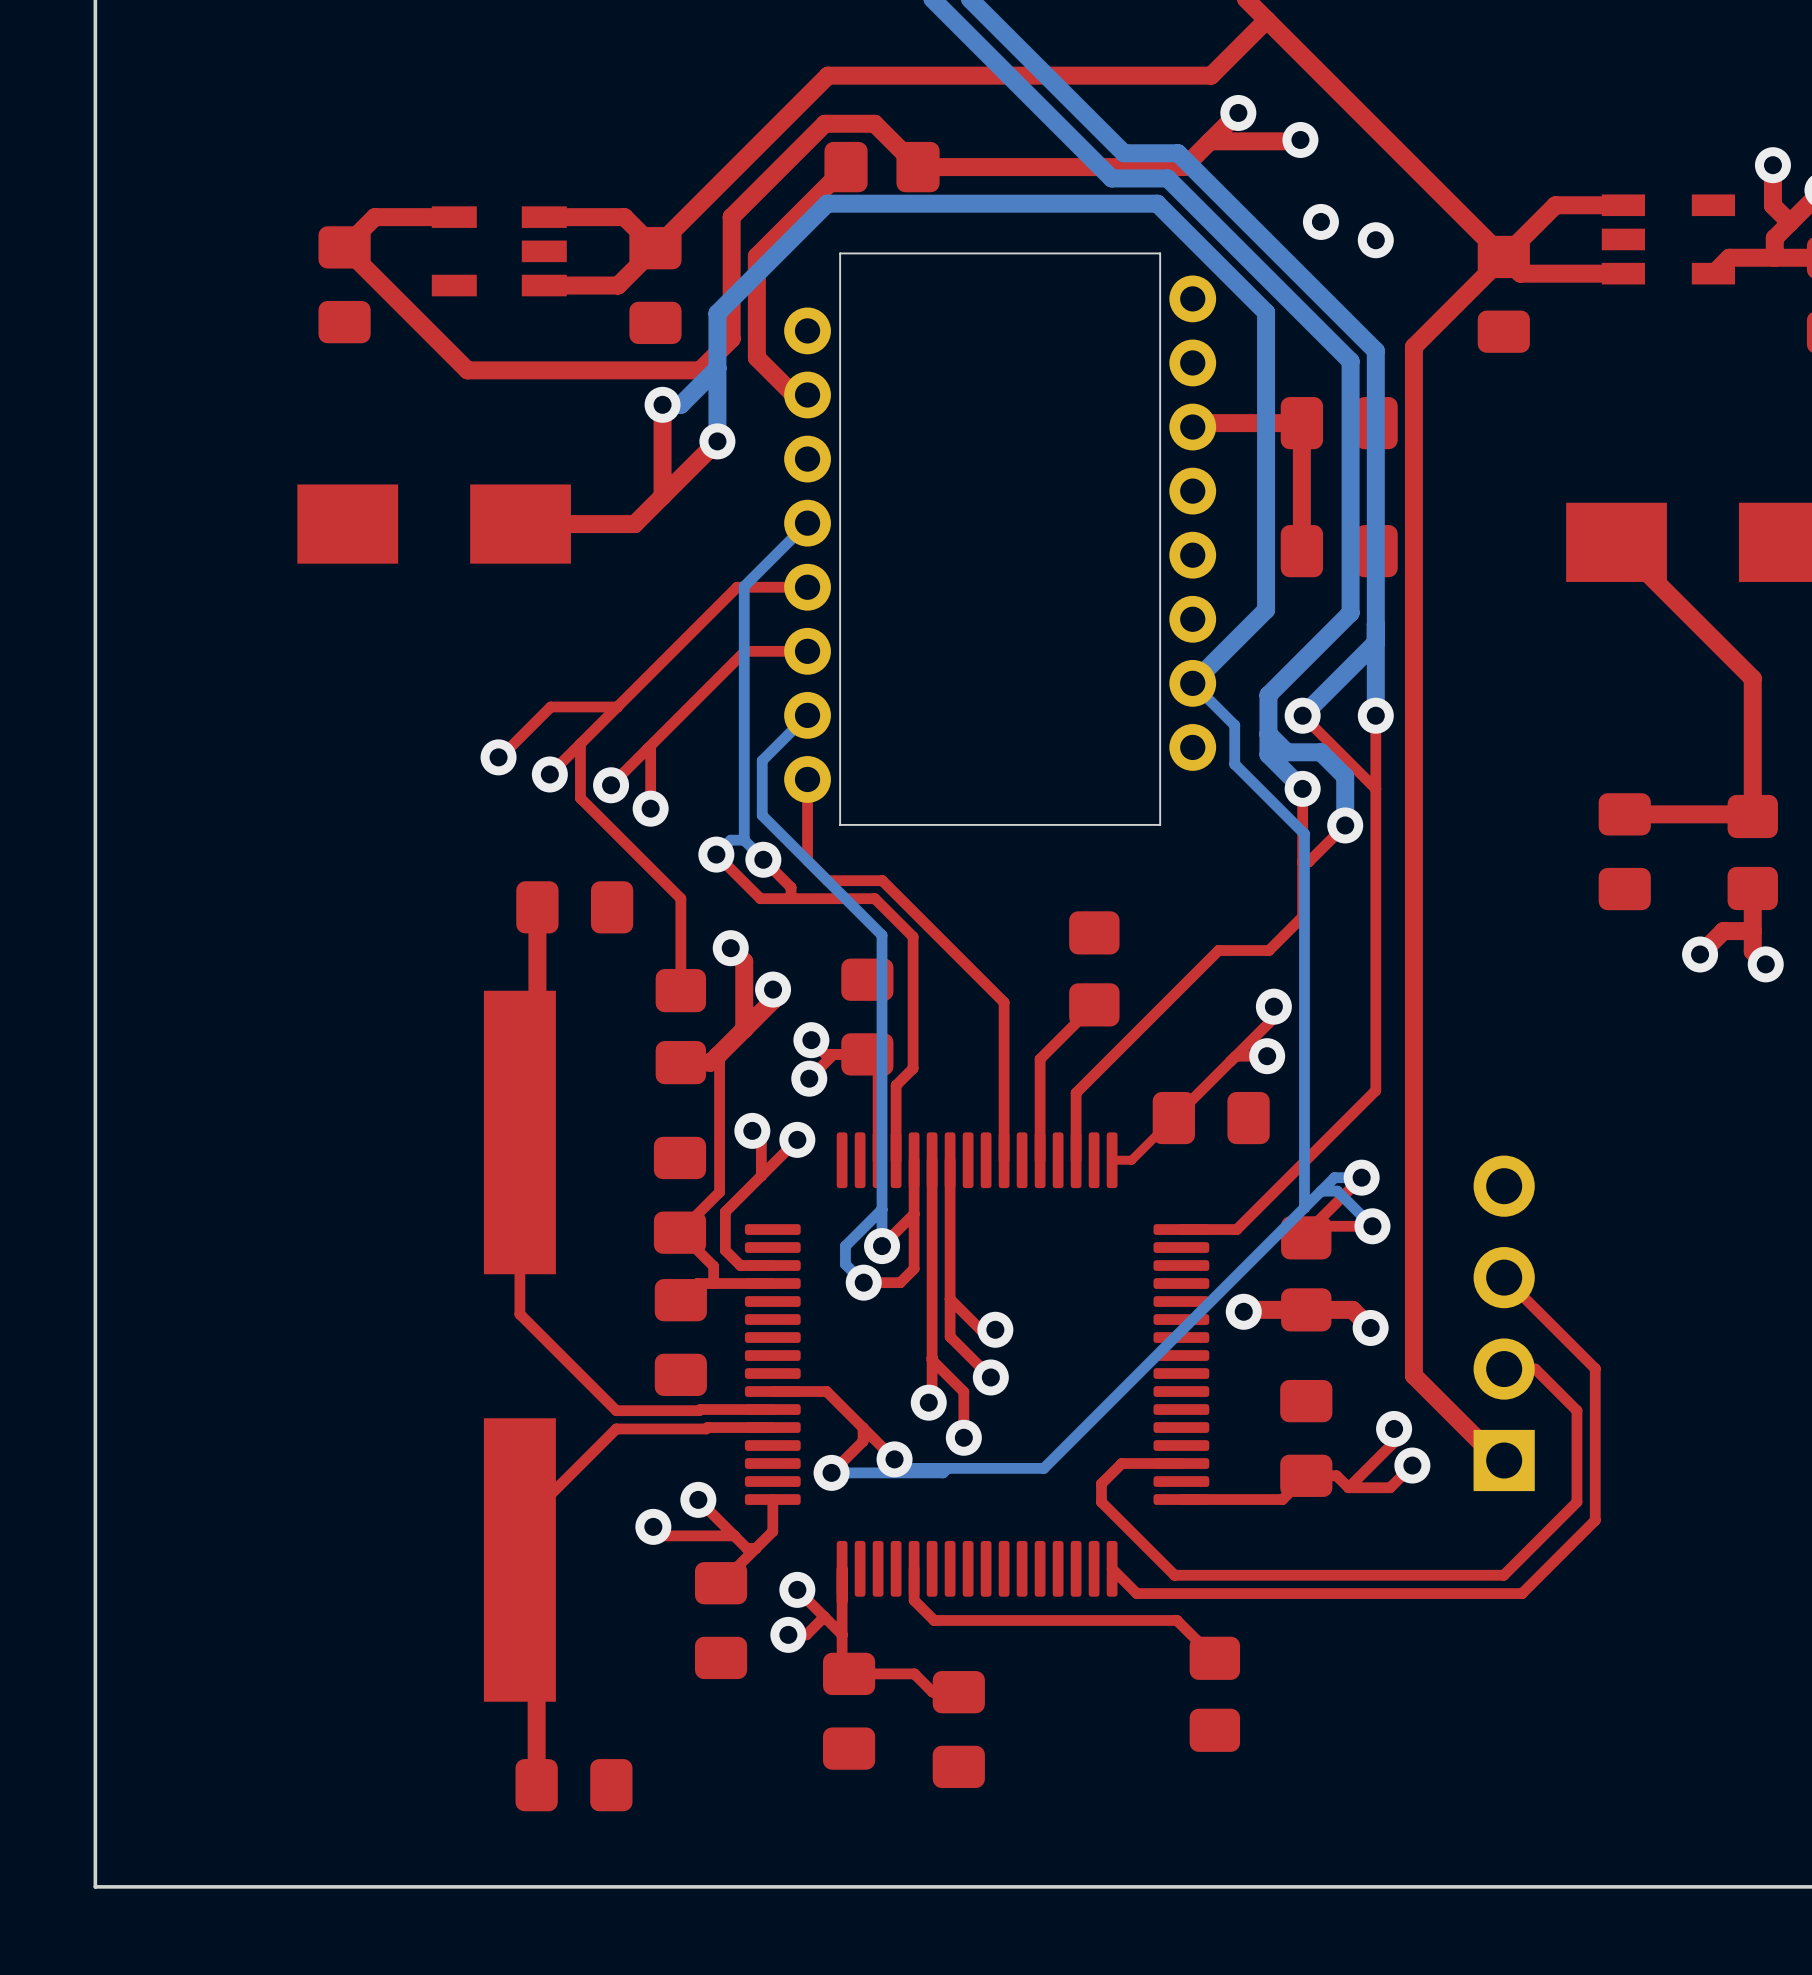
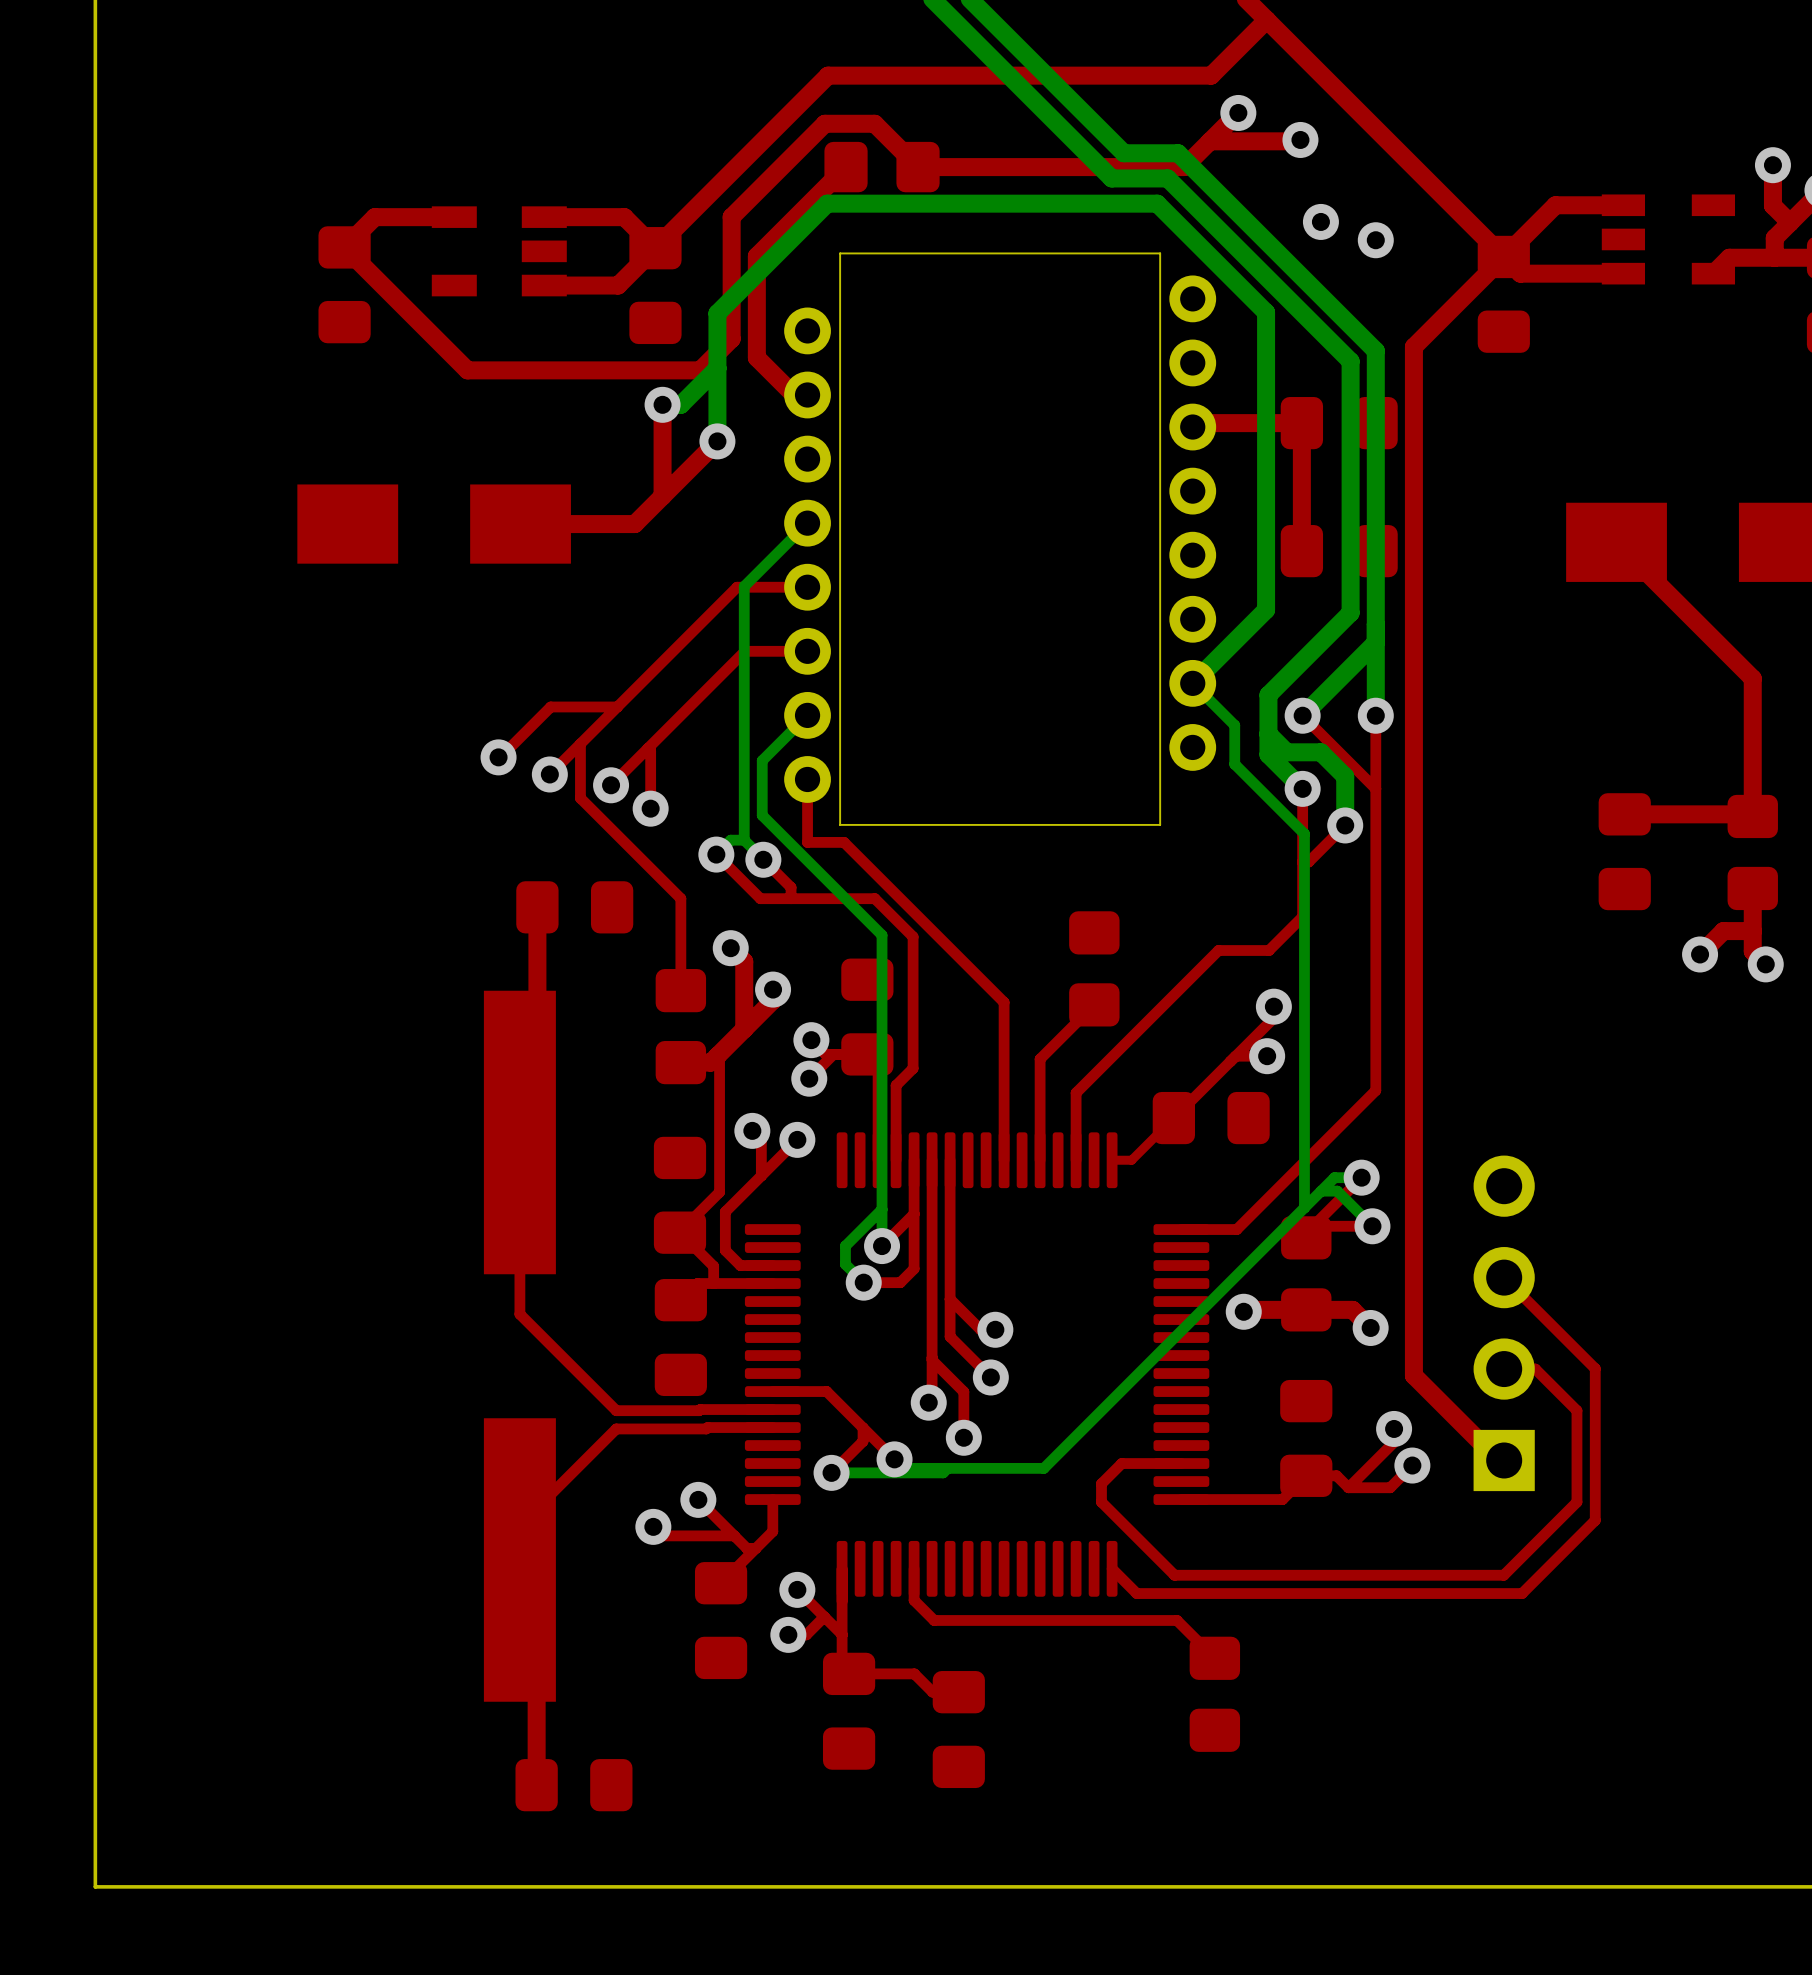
top track: (807, 842) (807, 860) (827, 880) (882, 880) -> (807, 842) (844, 842) (882, 880)

